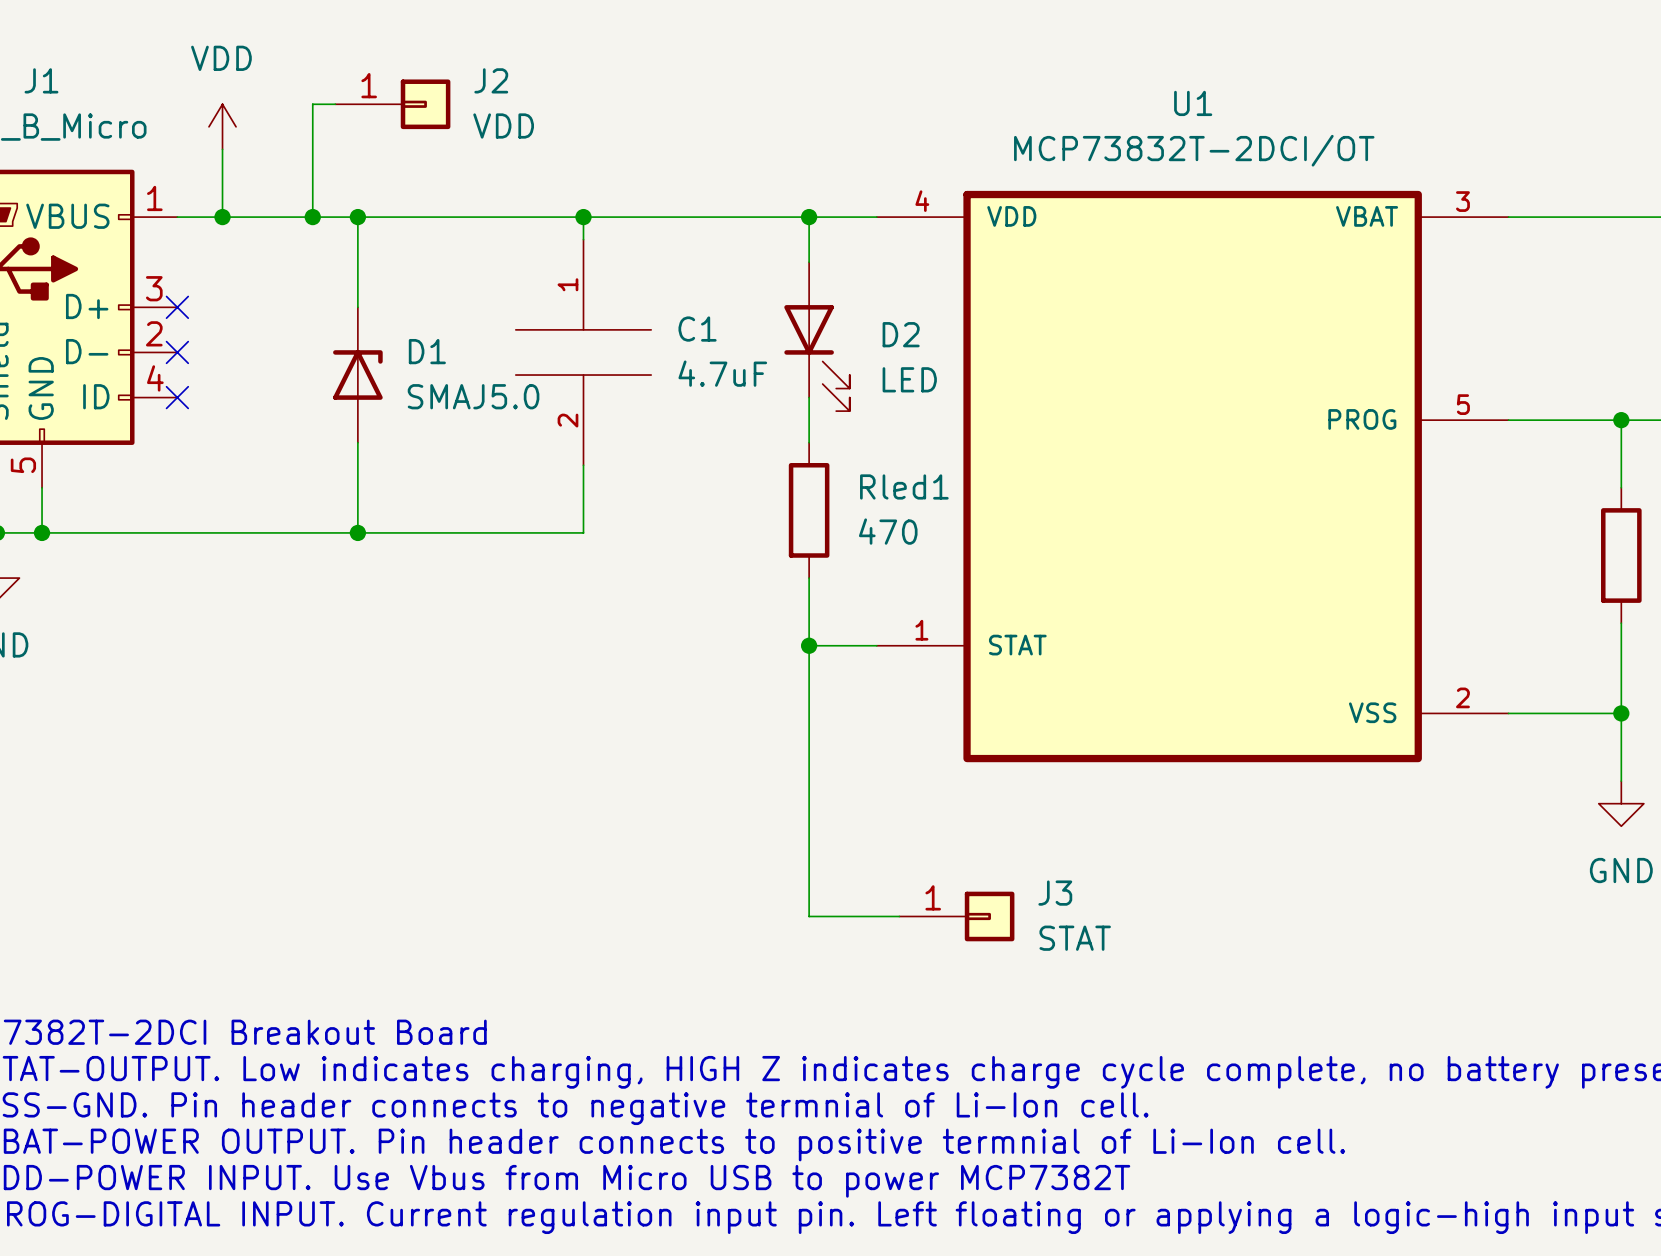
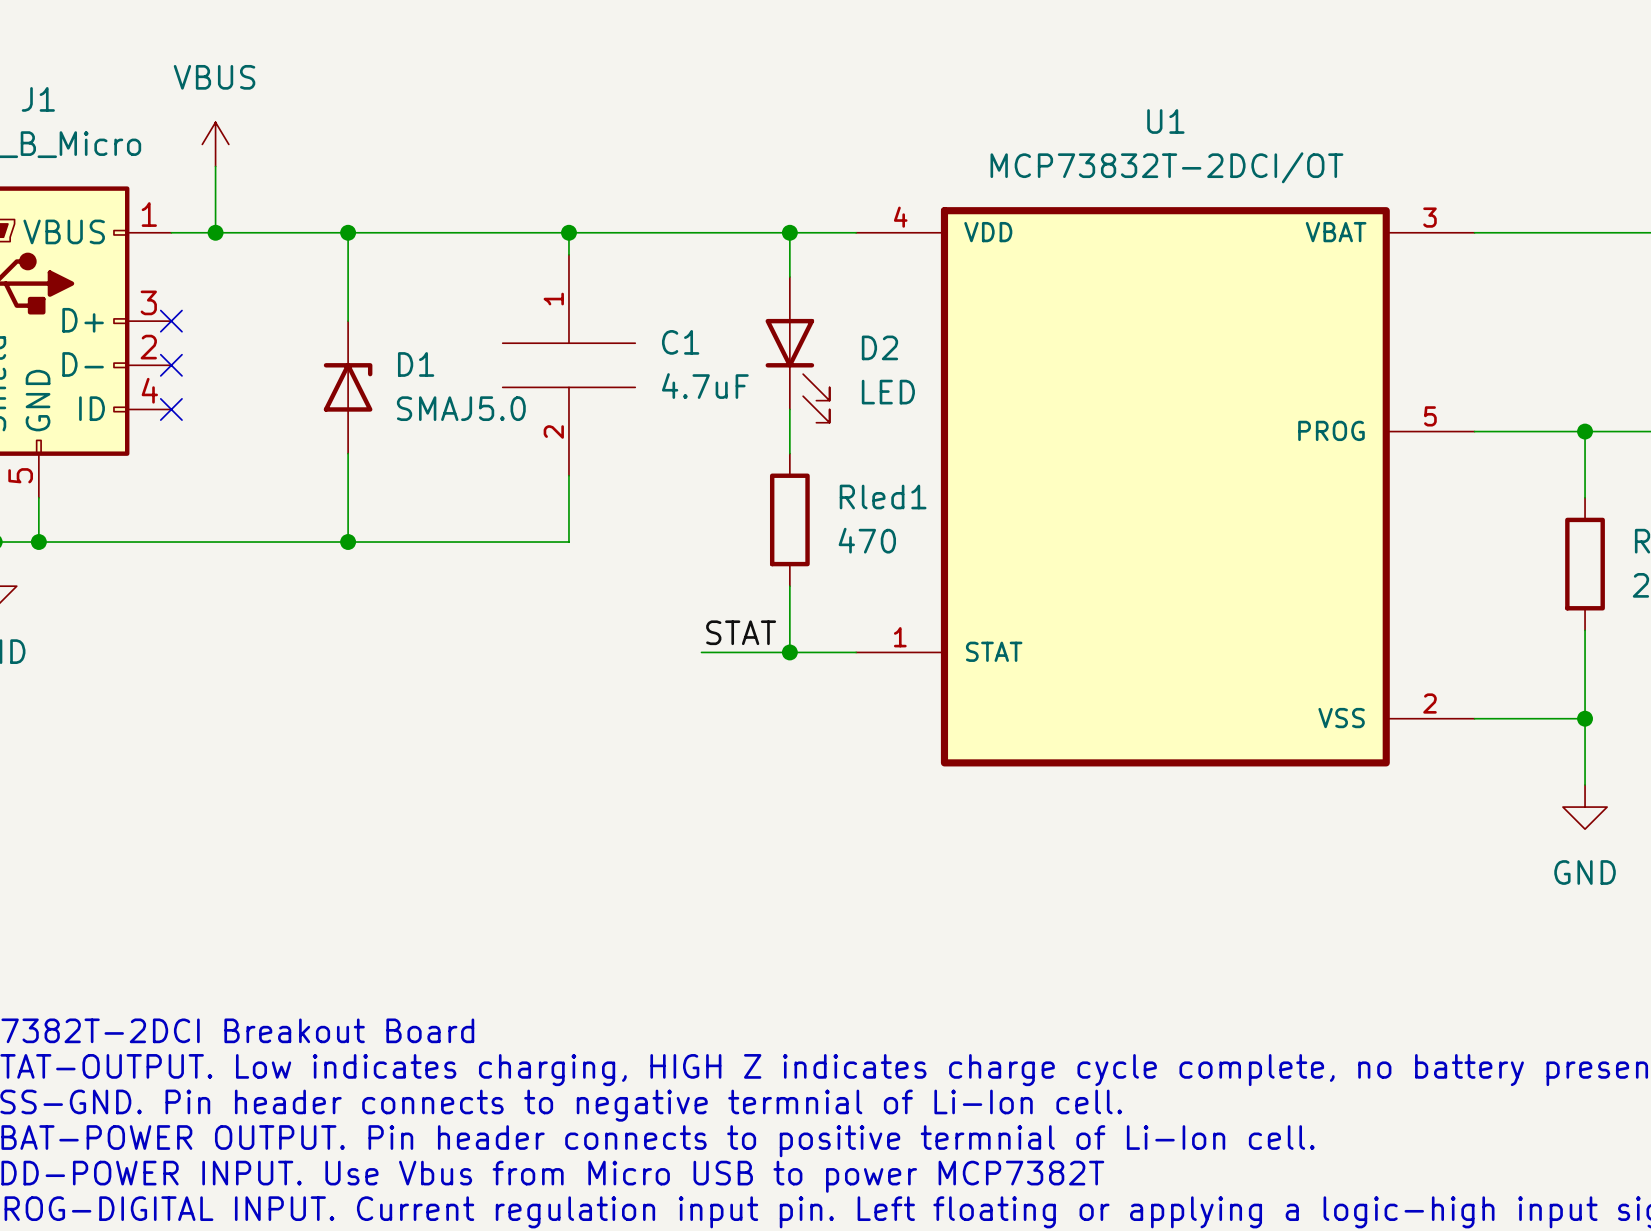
wire: (335, 104) (312, 104) (312, 217) -> none
J2: VDD (392, 104) -> none
power symbol: VDD (222, 126) -> VBUS (215, 144)
junction: (312, 217) -> none
label: none -> STAT (741, 632)
wire: (809, 645) (809, 916) (899, 916) -> (789, 652) (701, 652)
J3: STAT (956, 916) -> none

